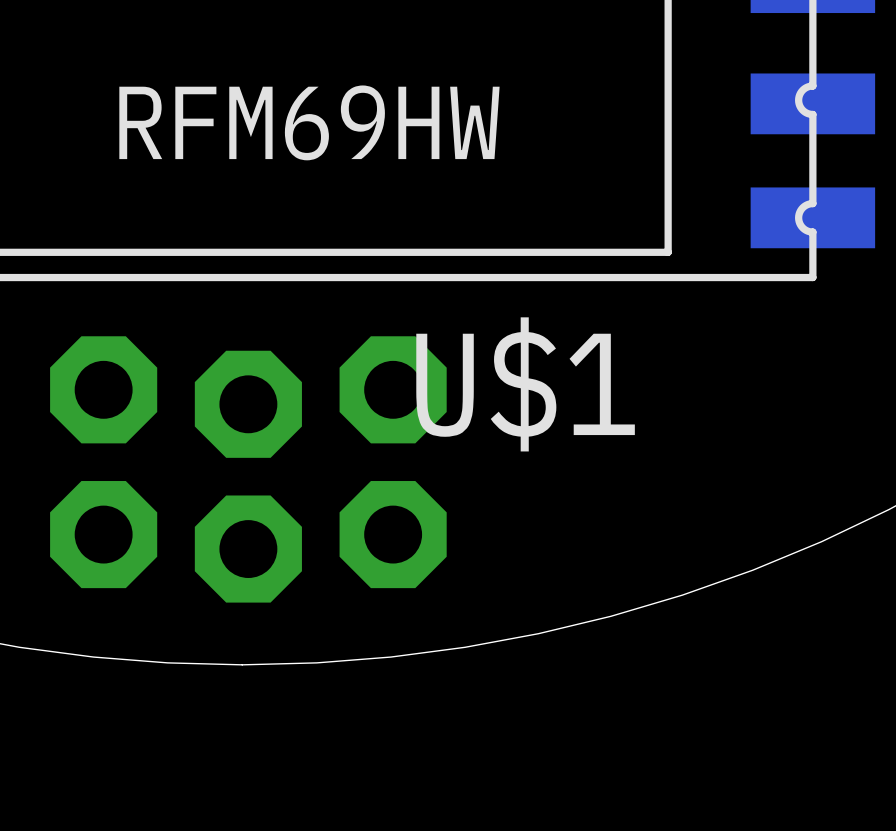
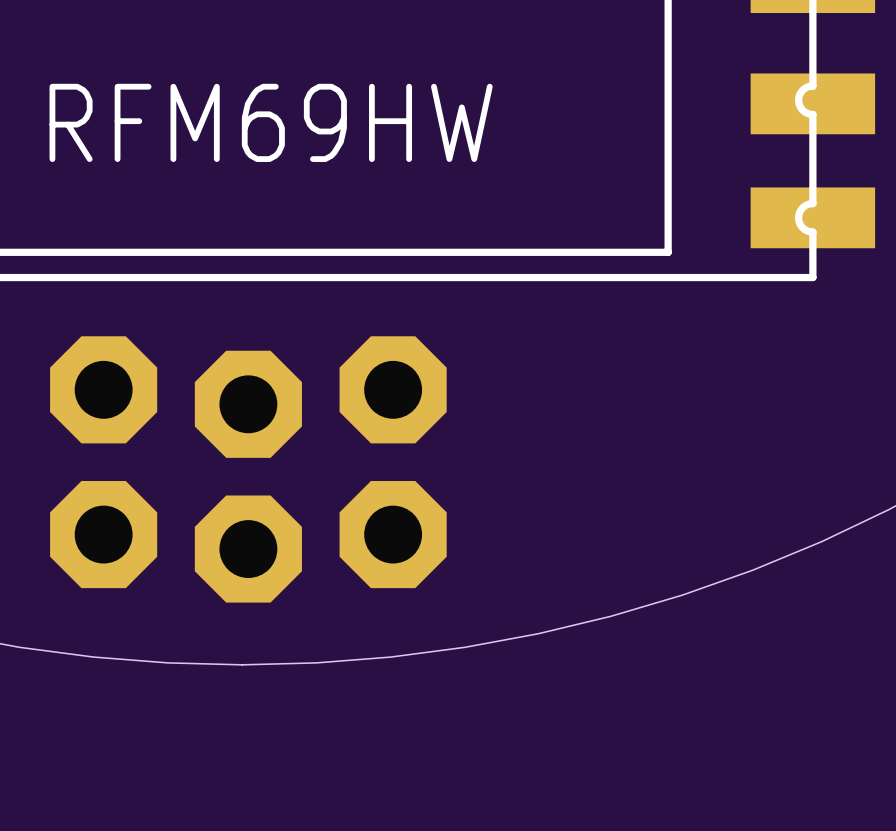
U$1 name: U$1 (525, 384) -> none

